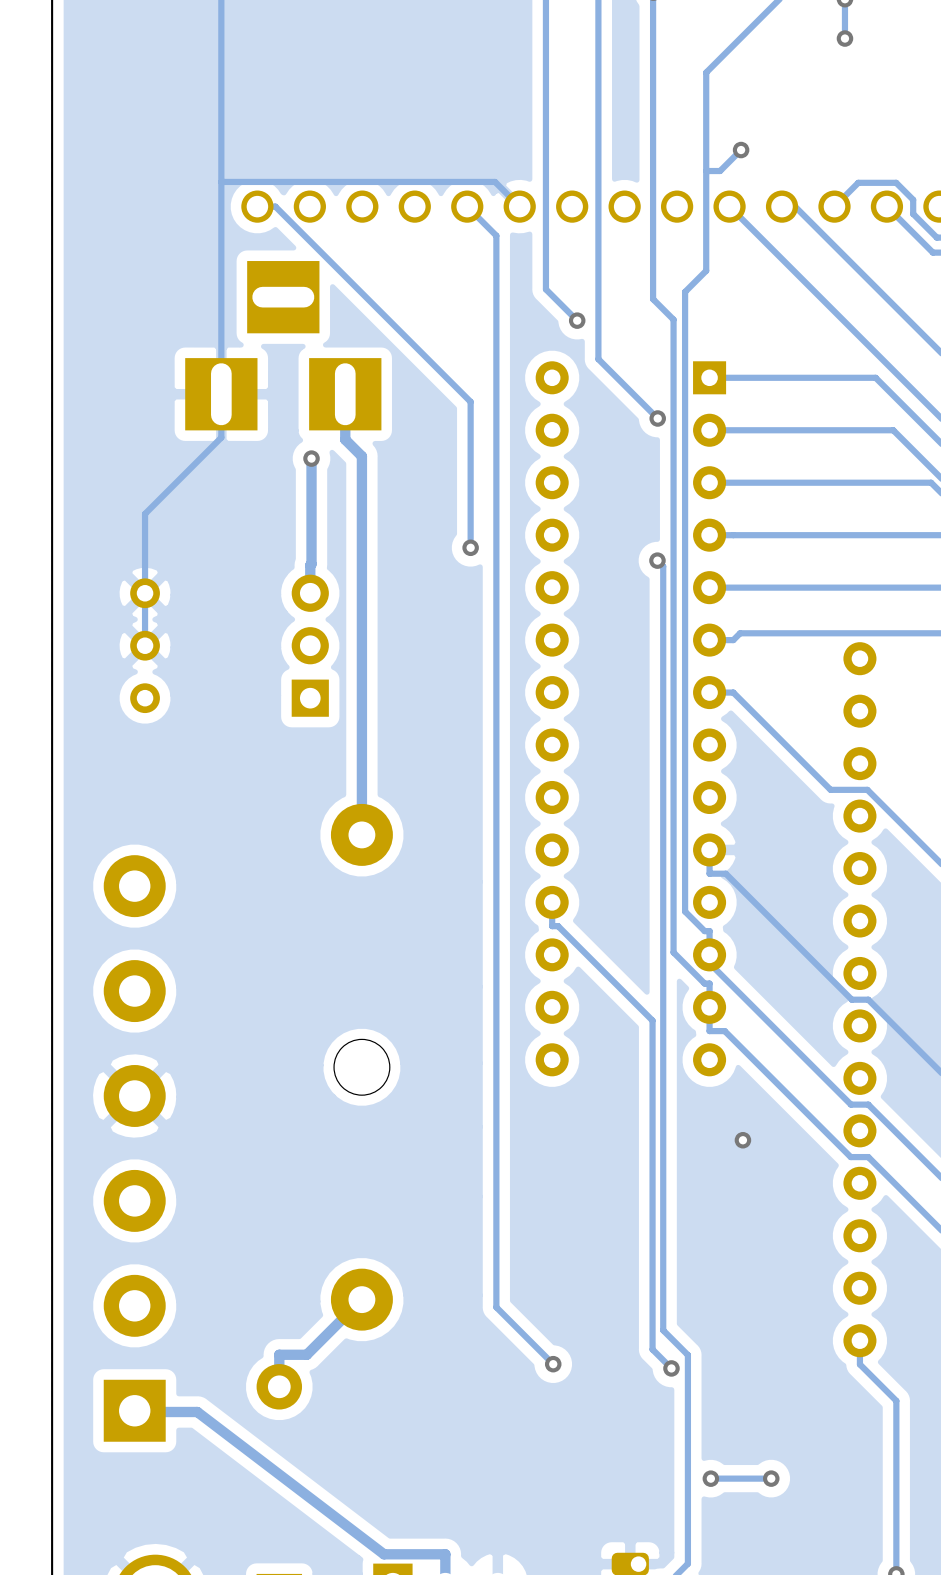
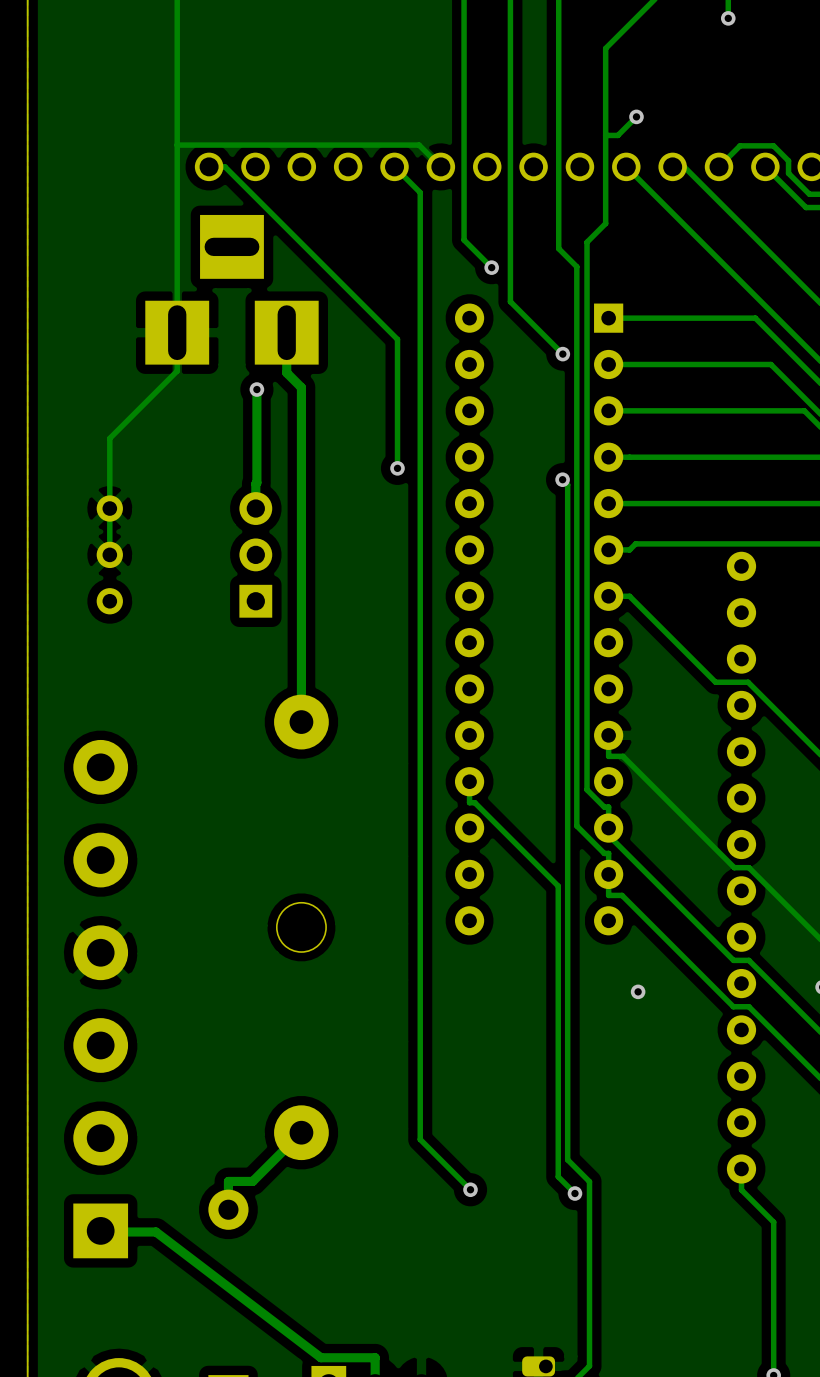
via: (710, 1478) -> none
track: (771, 1478) (710, 1478) -> none
via: (771, 1478) -> none

